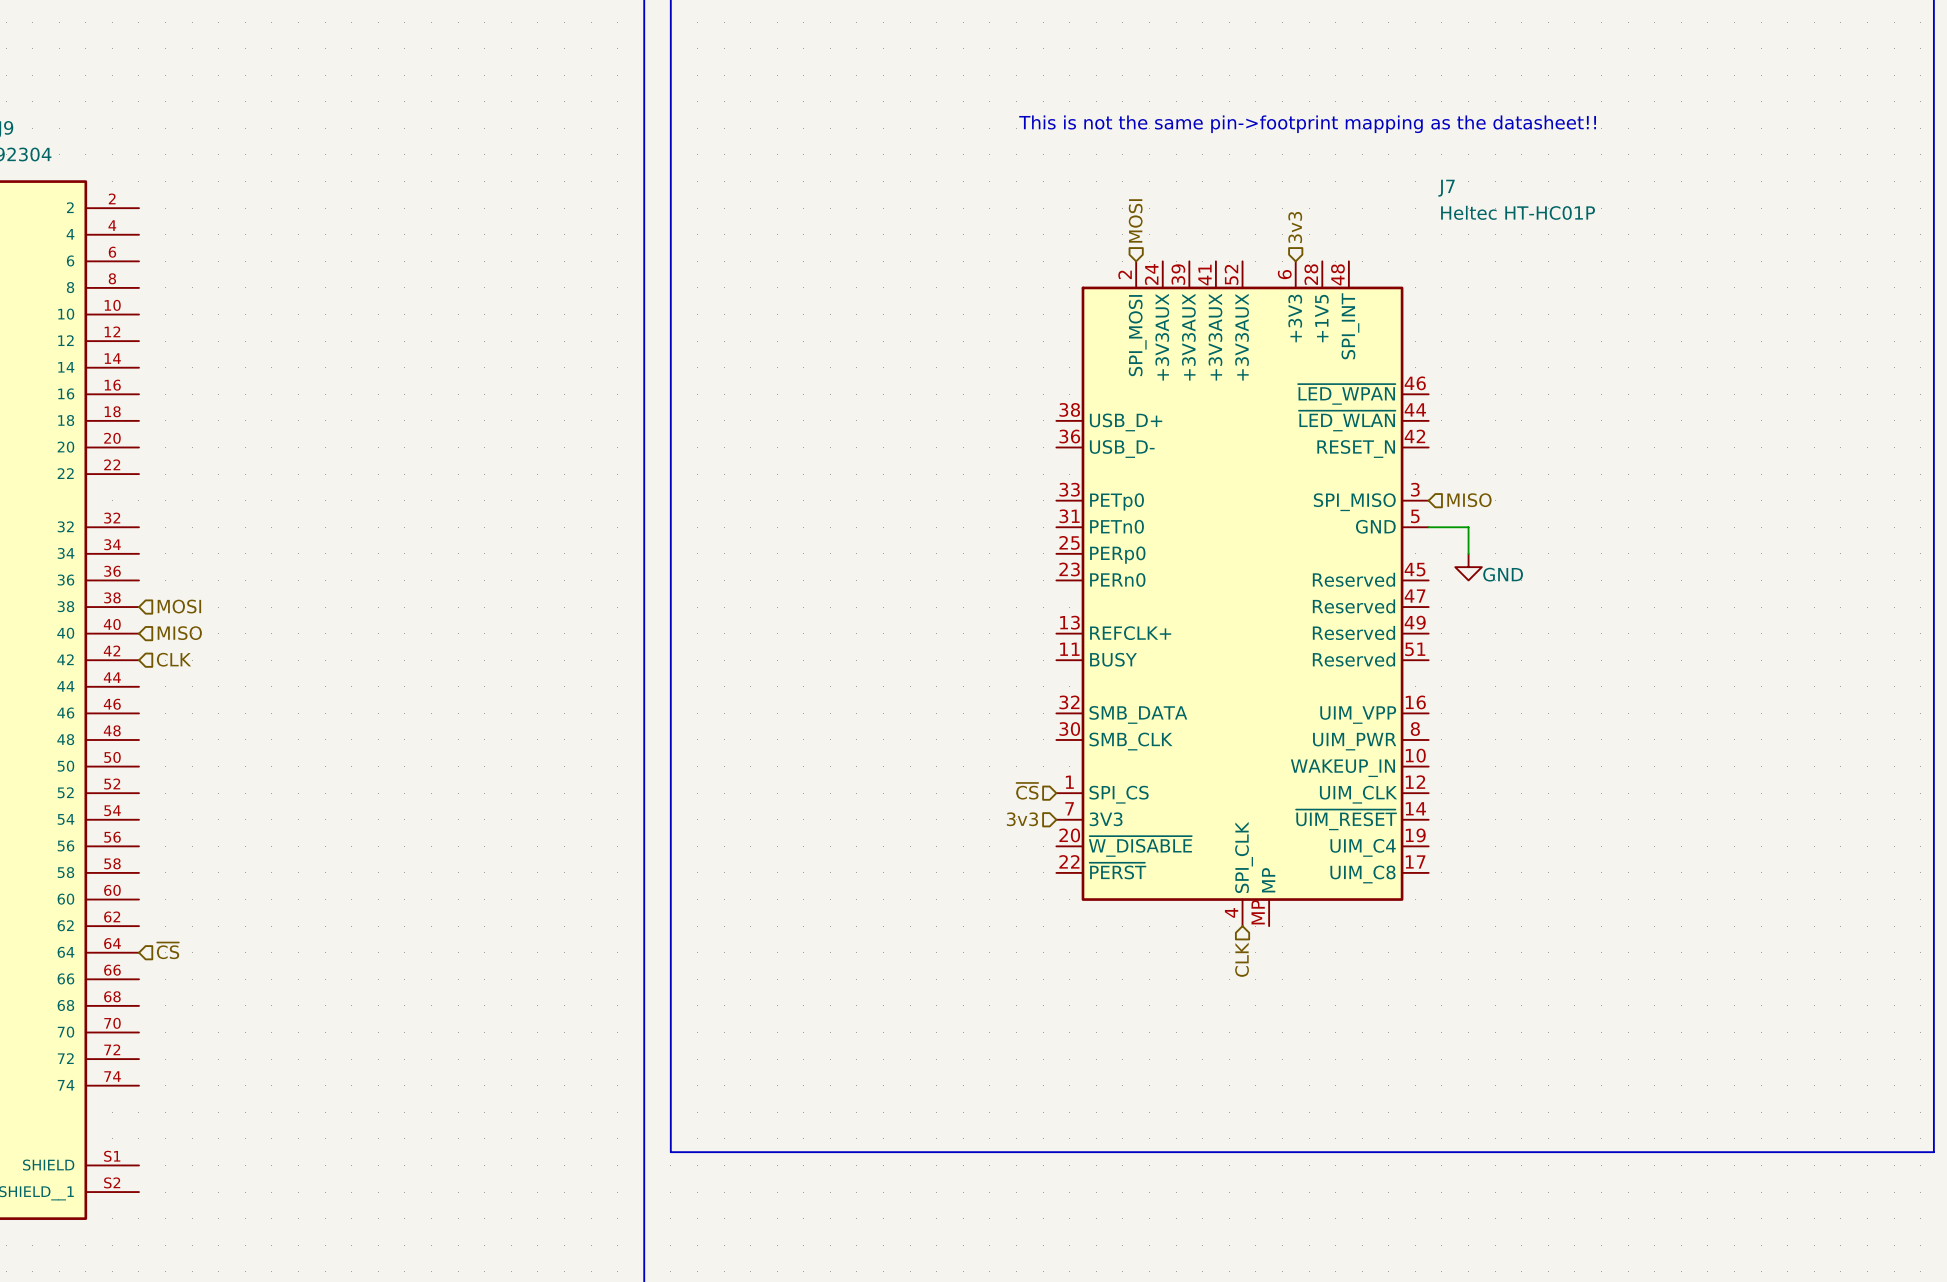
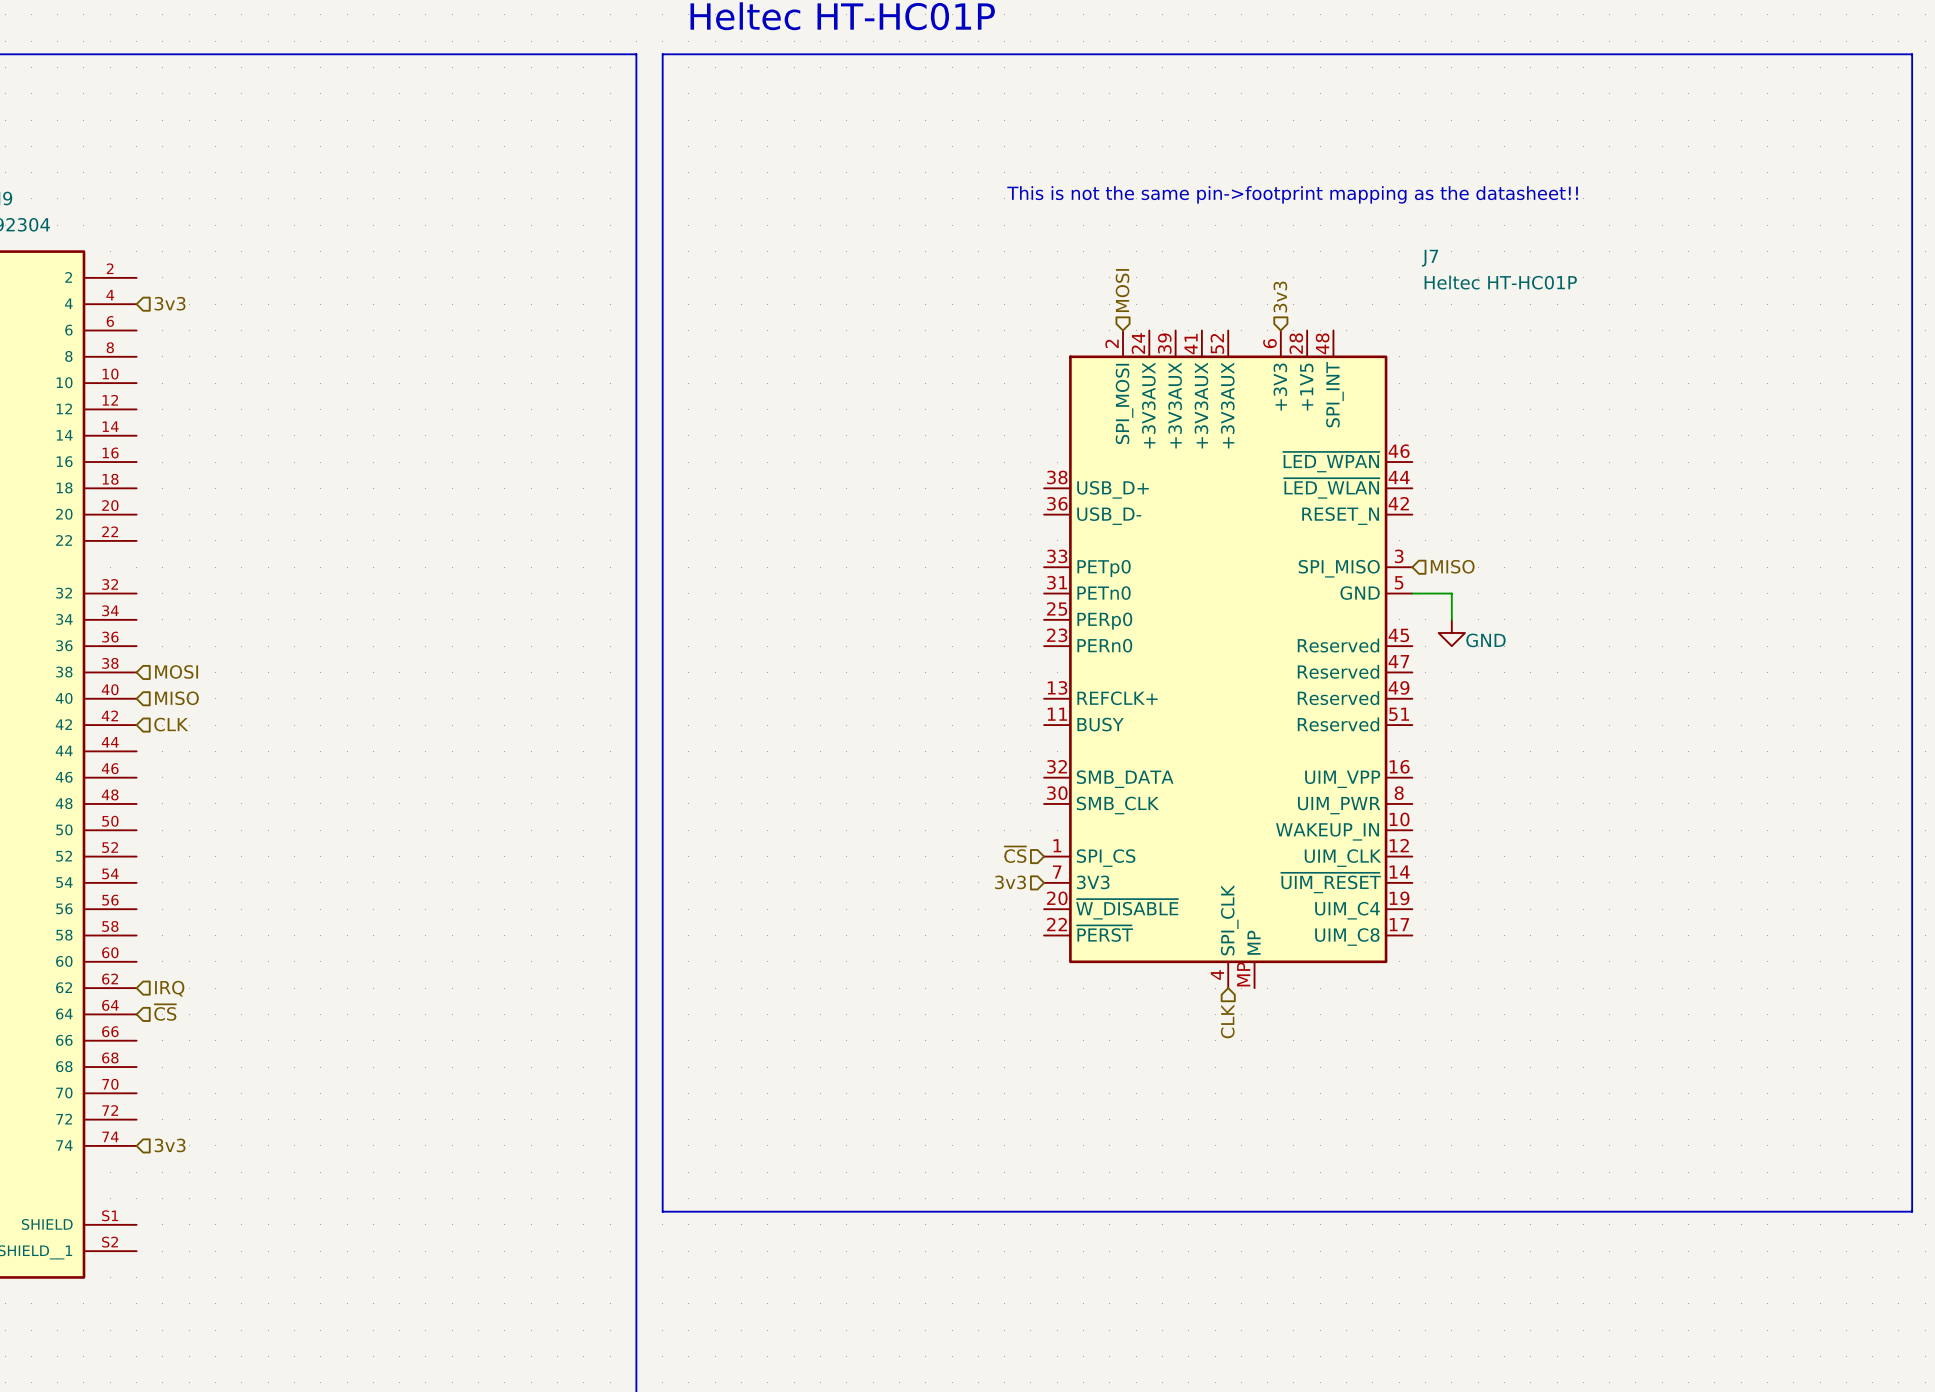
hierarchical label: none -> 3v3 (170, 303)
hierarchical label: none -> IRQ (169, 988)
hierarchical label: none -> 3v3 (170, 1145)

